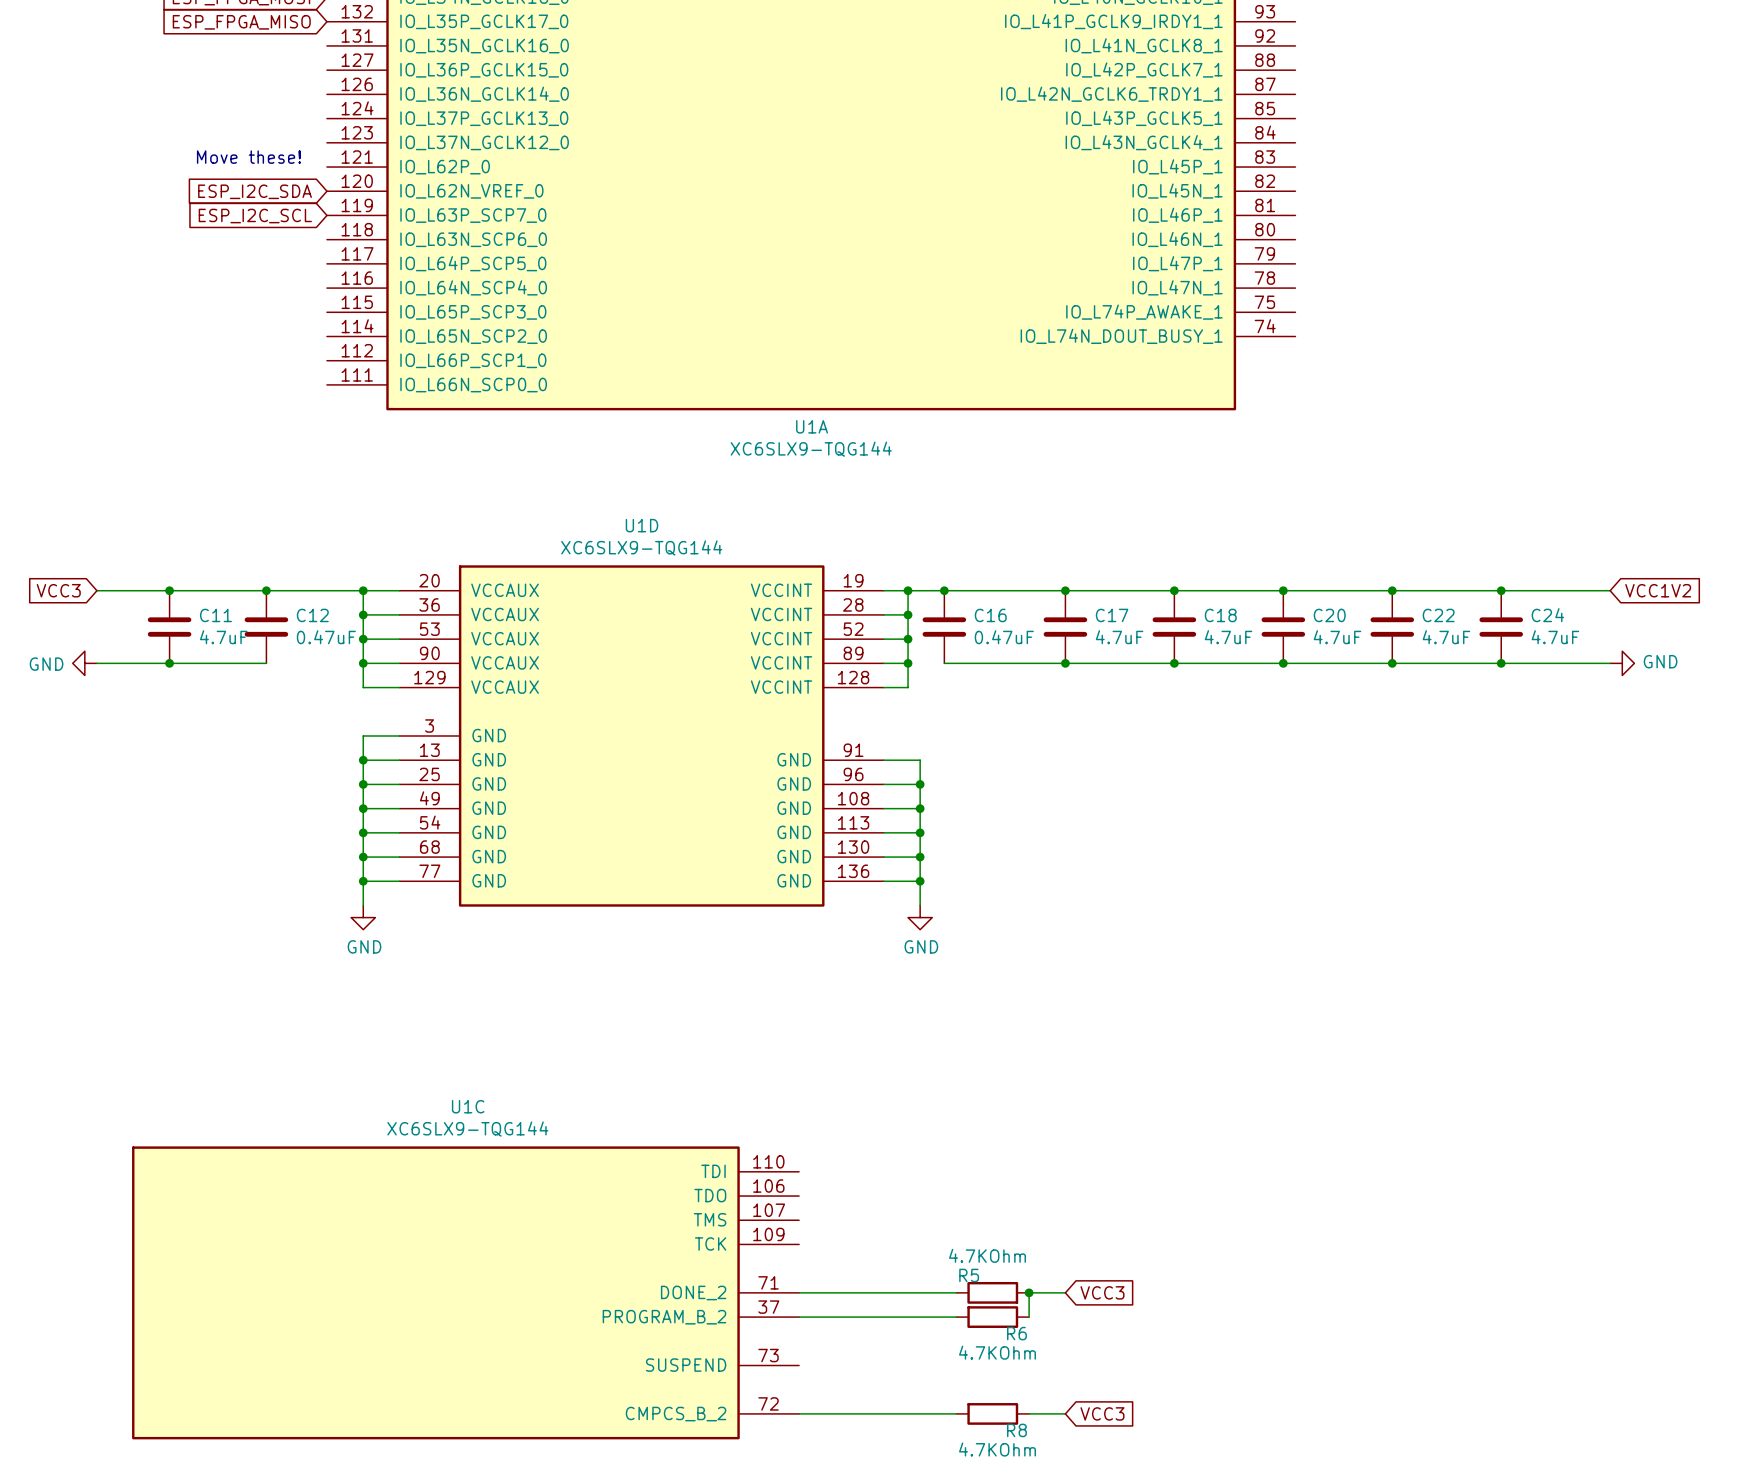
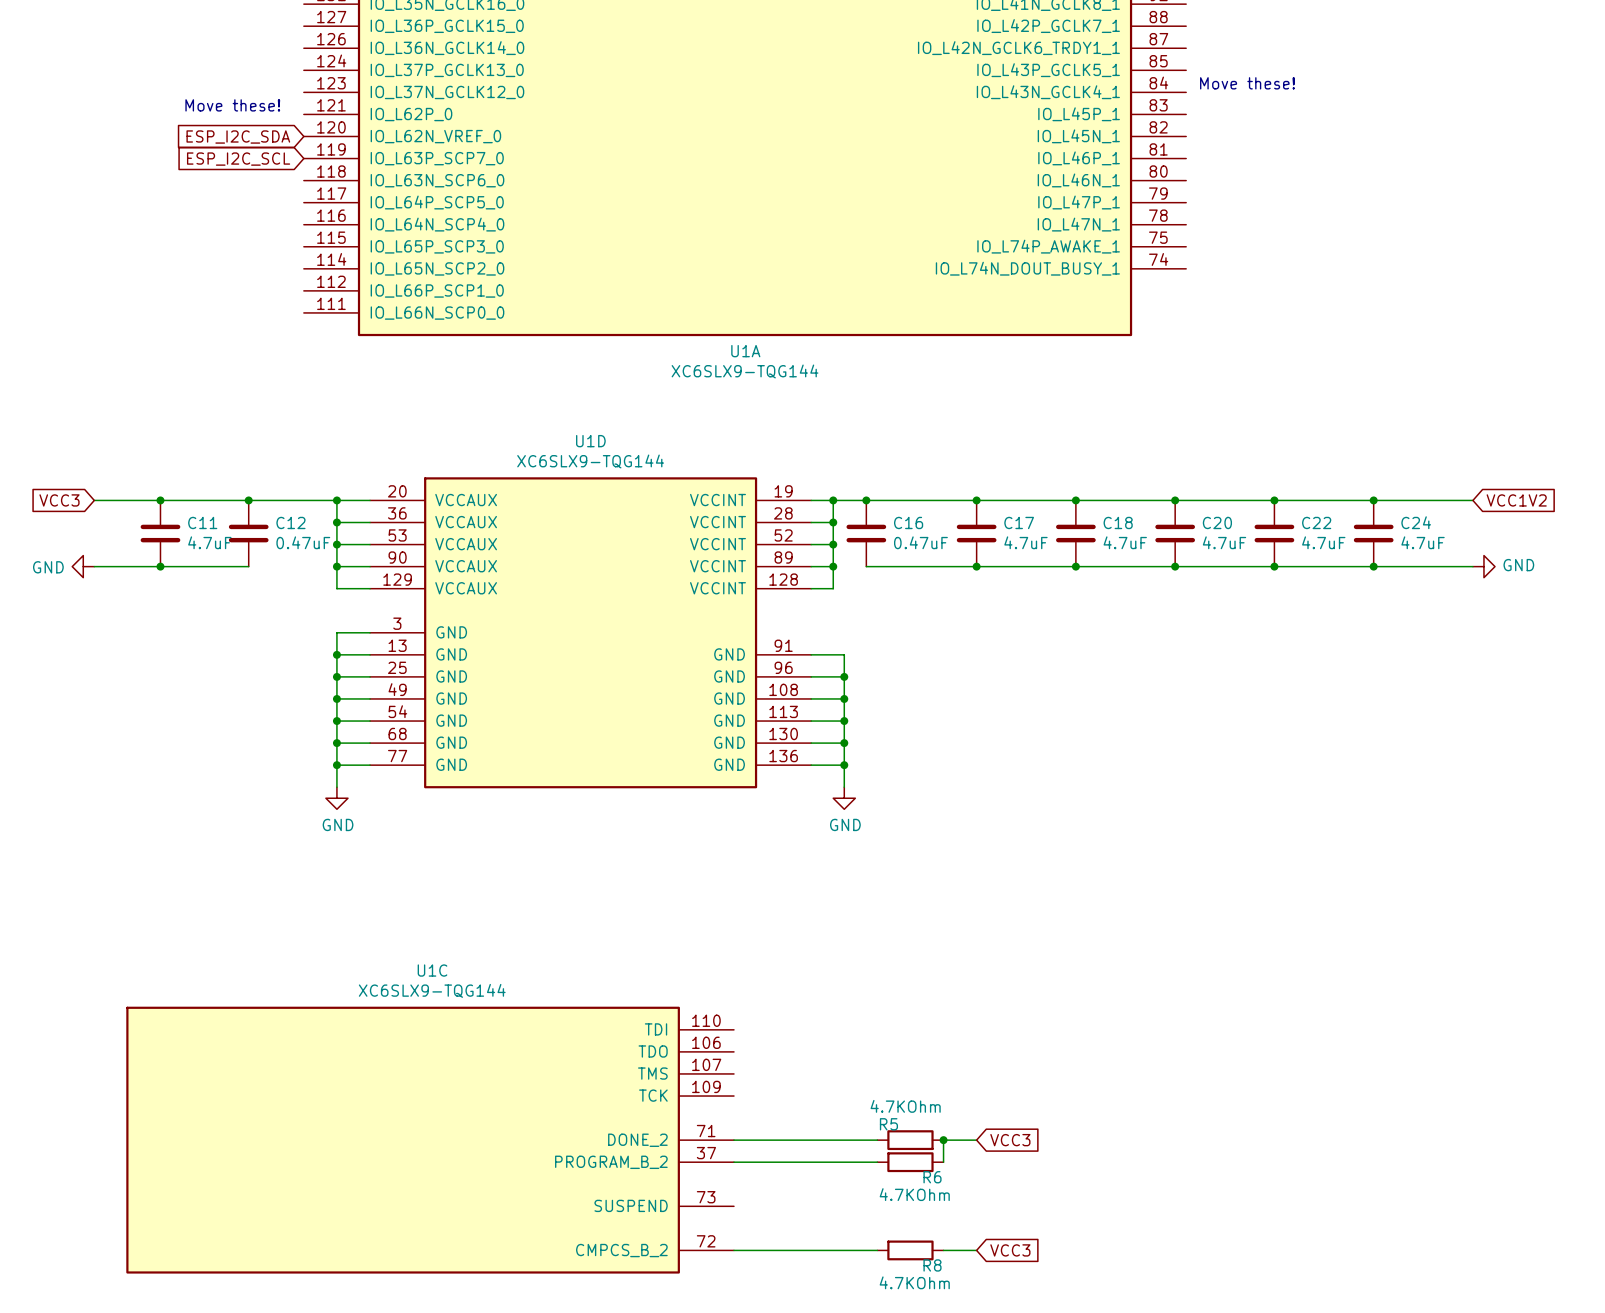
text: none -> Move these! (1247, 83)

